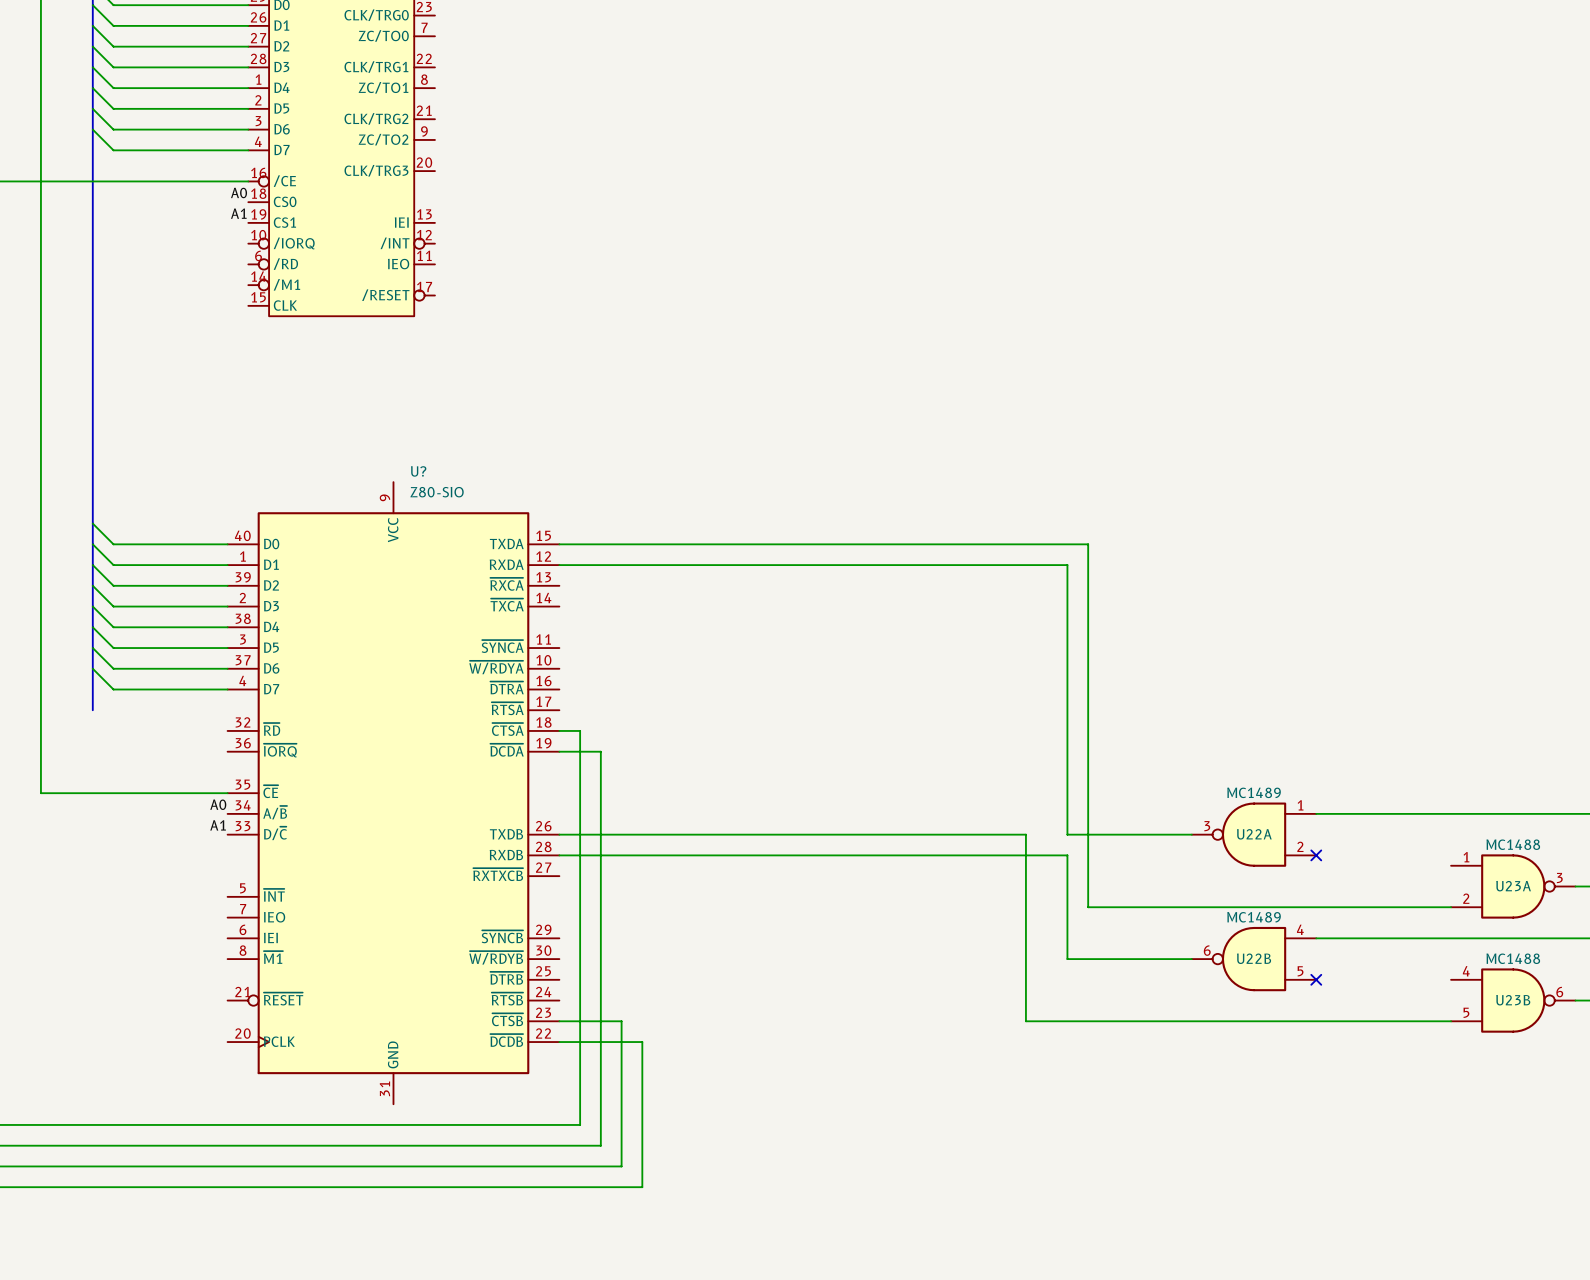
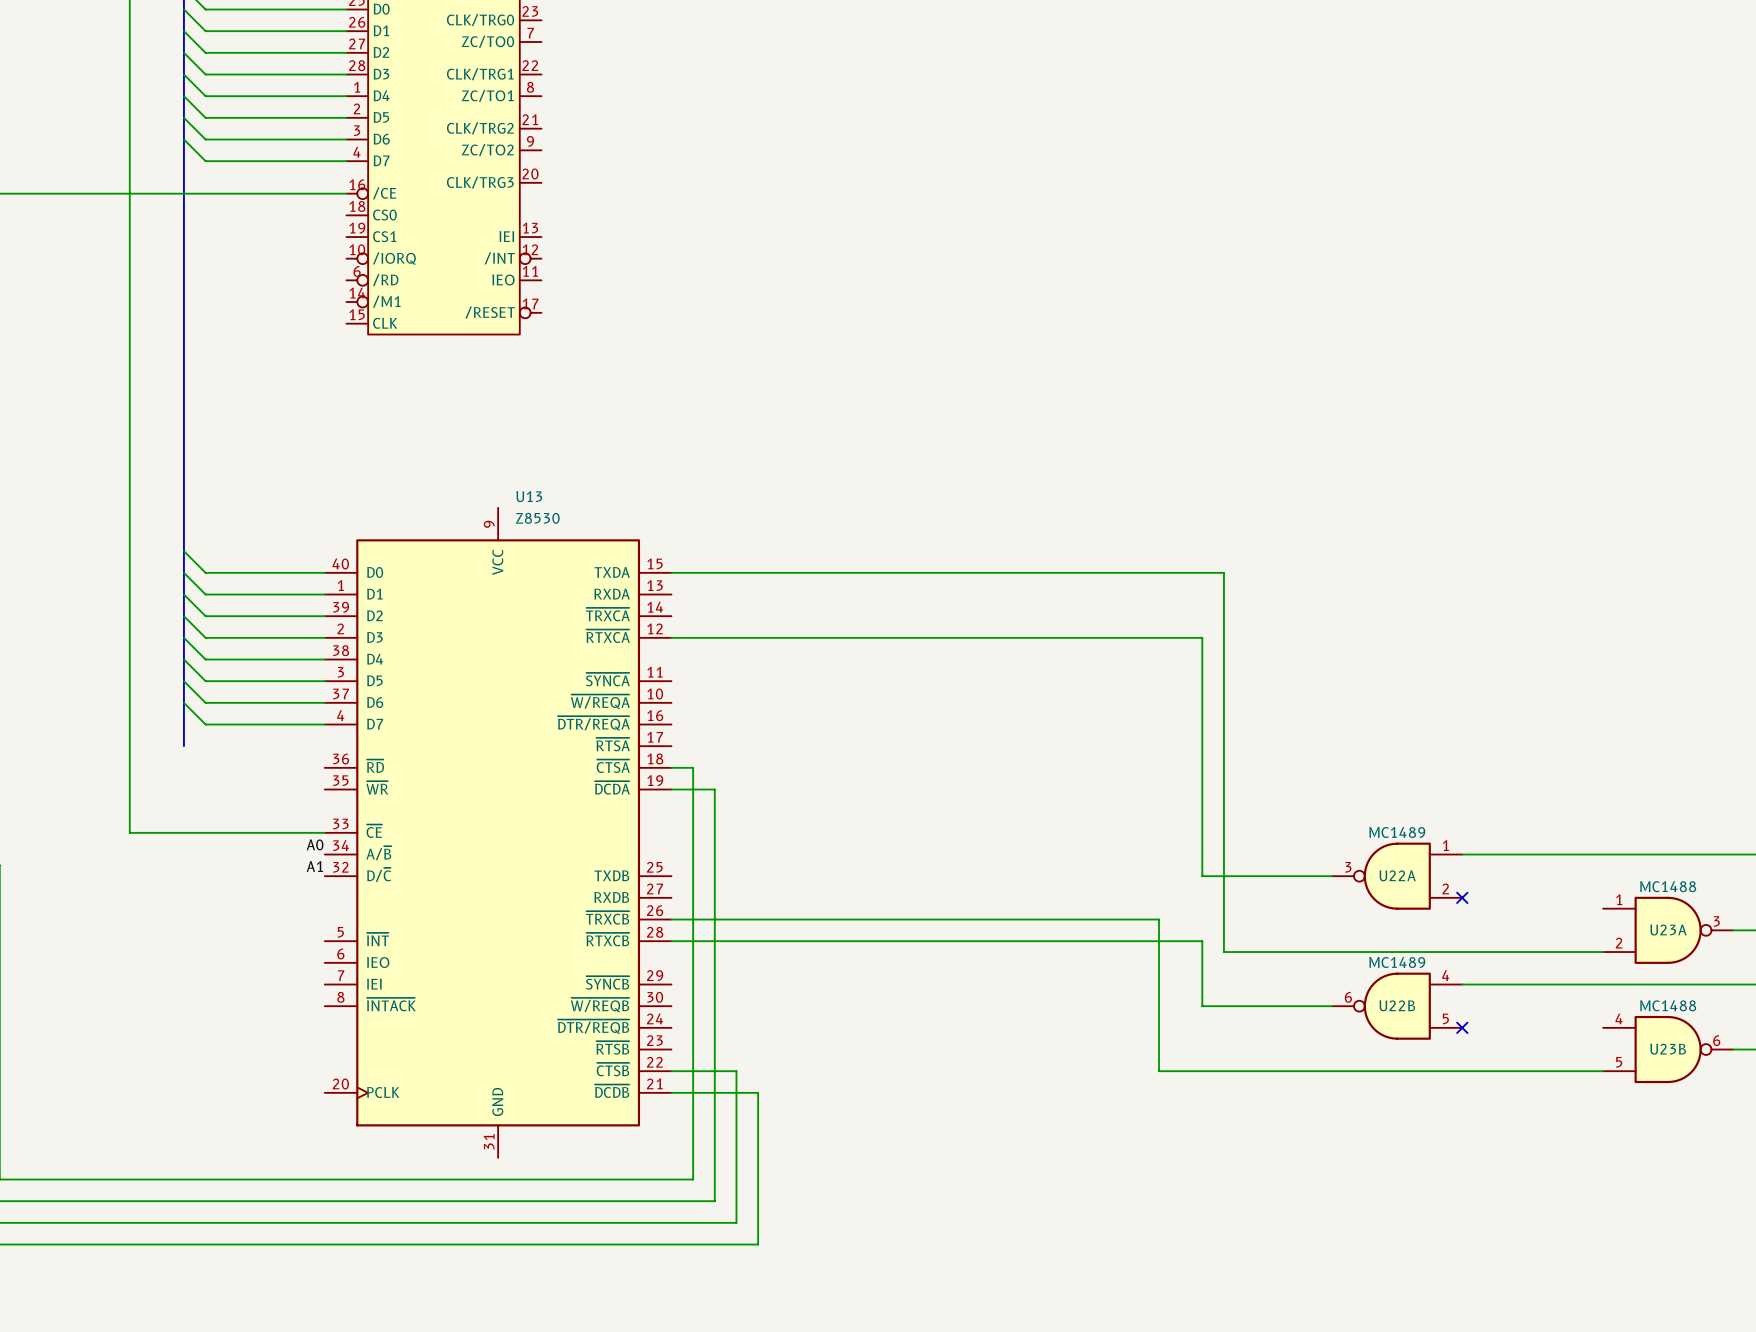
label: A0 (239, 192) -> none
label: A1 (238, 213) -> none
wire: (559, 565) (1067, 565) (1067, 606) -> (671, 637) (1202, 637)
U?: Z80-SIO (393, 793) -> none
U13: none -> Z8530 (498, 832)
wire: (559, 834) (1025, 834) (1025, 876) -> (671, 919) (1158, 919)
wire: (559, 855) (1067, 855) (1067, 896) -> (671, 941) (1202, 941)

